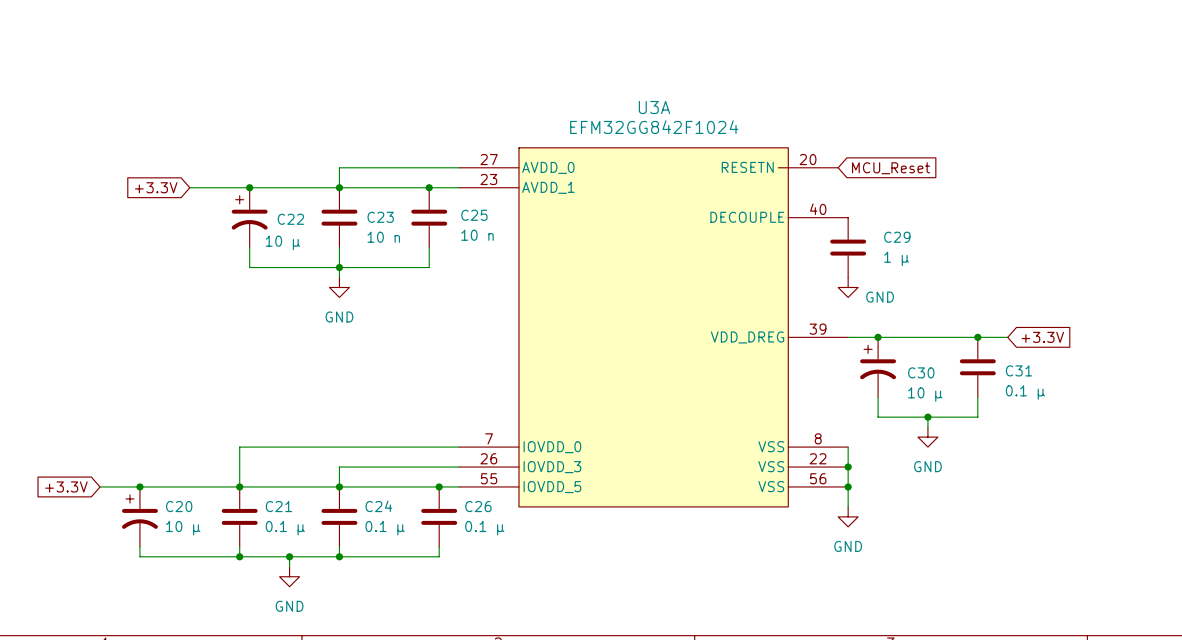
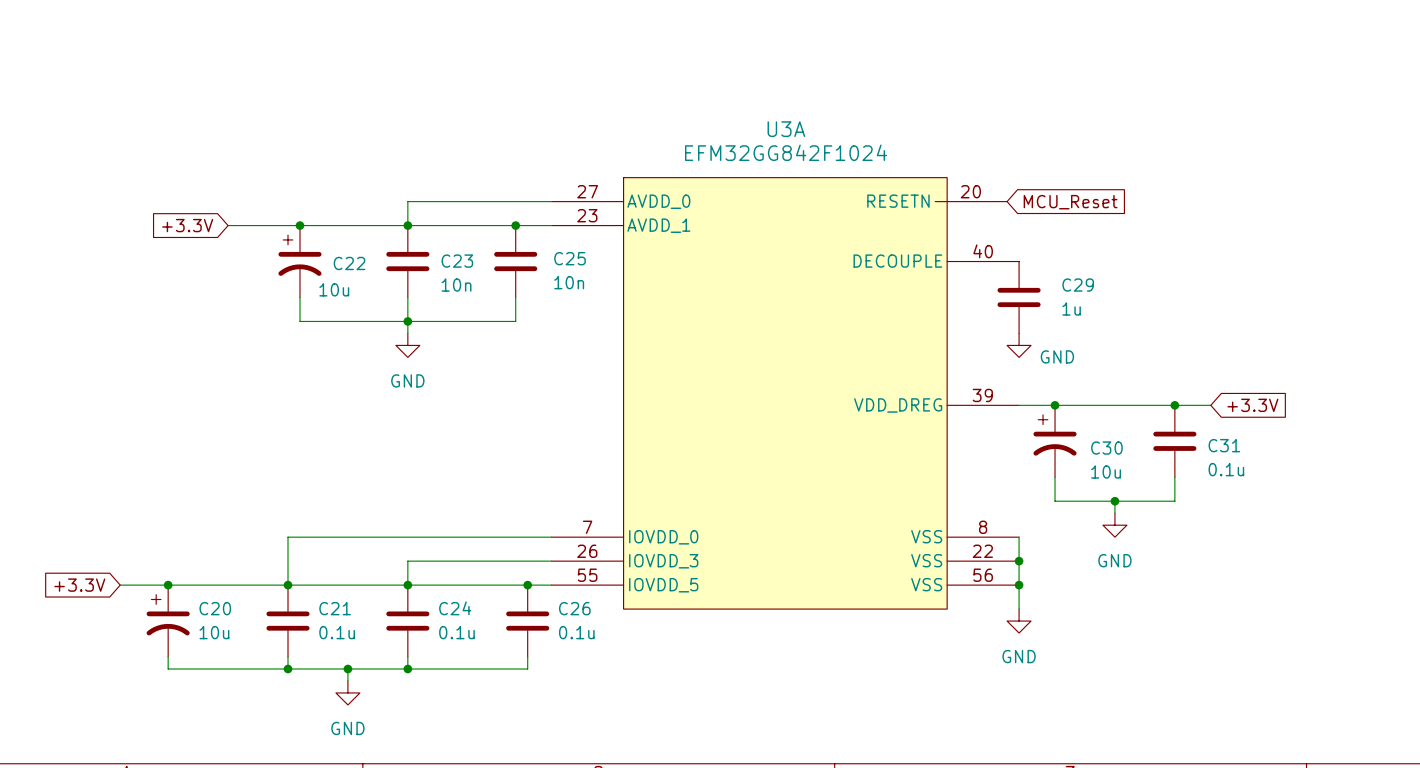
C25 value: 10 n (477, 235) -> 10n (569, 282)
C23 value: 10 n (383, 237) -> 10n (456, 285)
C22 value: 10 µ (282, 242) -> 10u (334, 289)
C29 value: 1 µ (896, 258) -> 1u (1071, 309)
C31 value: 0.1 µ (1025, 392) -> 0.1u (1226, 469)
C30 value: 10 µ (925, 394) -> 10u (1106, 472)
C20 value: 10 µ (183, 528) -> 10u (214, 632)
C21 value: 0.1 µ (285, 528) -> 0.1u (337, 632)
C24 value: 0.1 µ (385, 528) -> 0.1u (456, 632)
C26 value: 0.1 µ (484, 528) -> 0.1u (576, 632)

